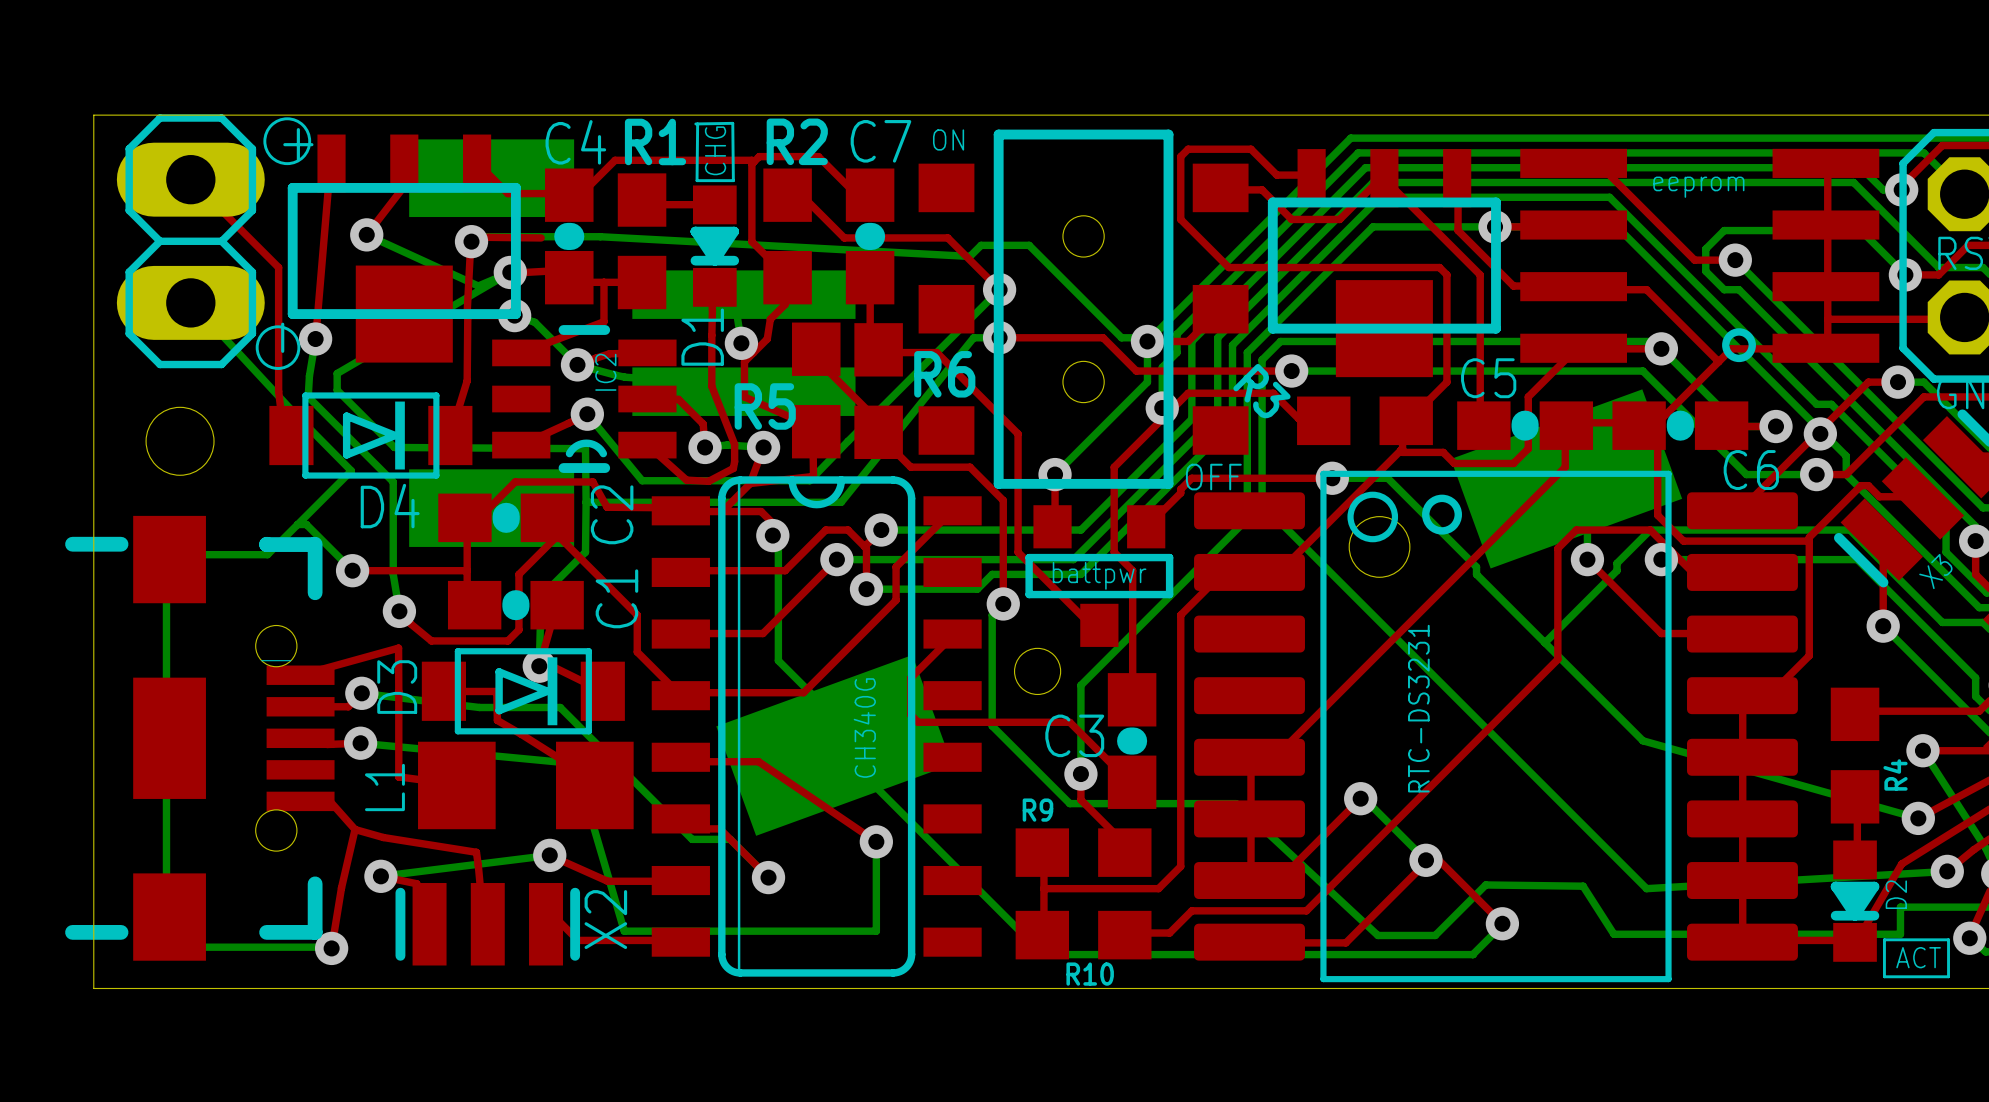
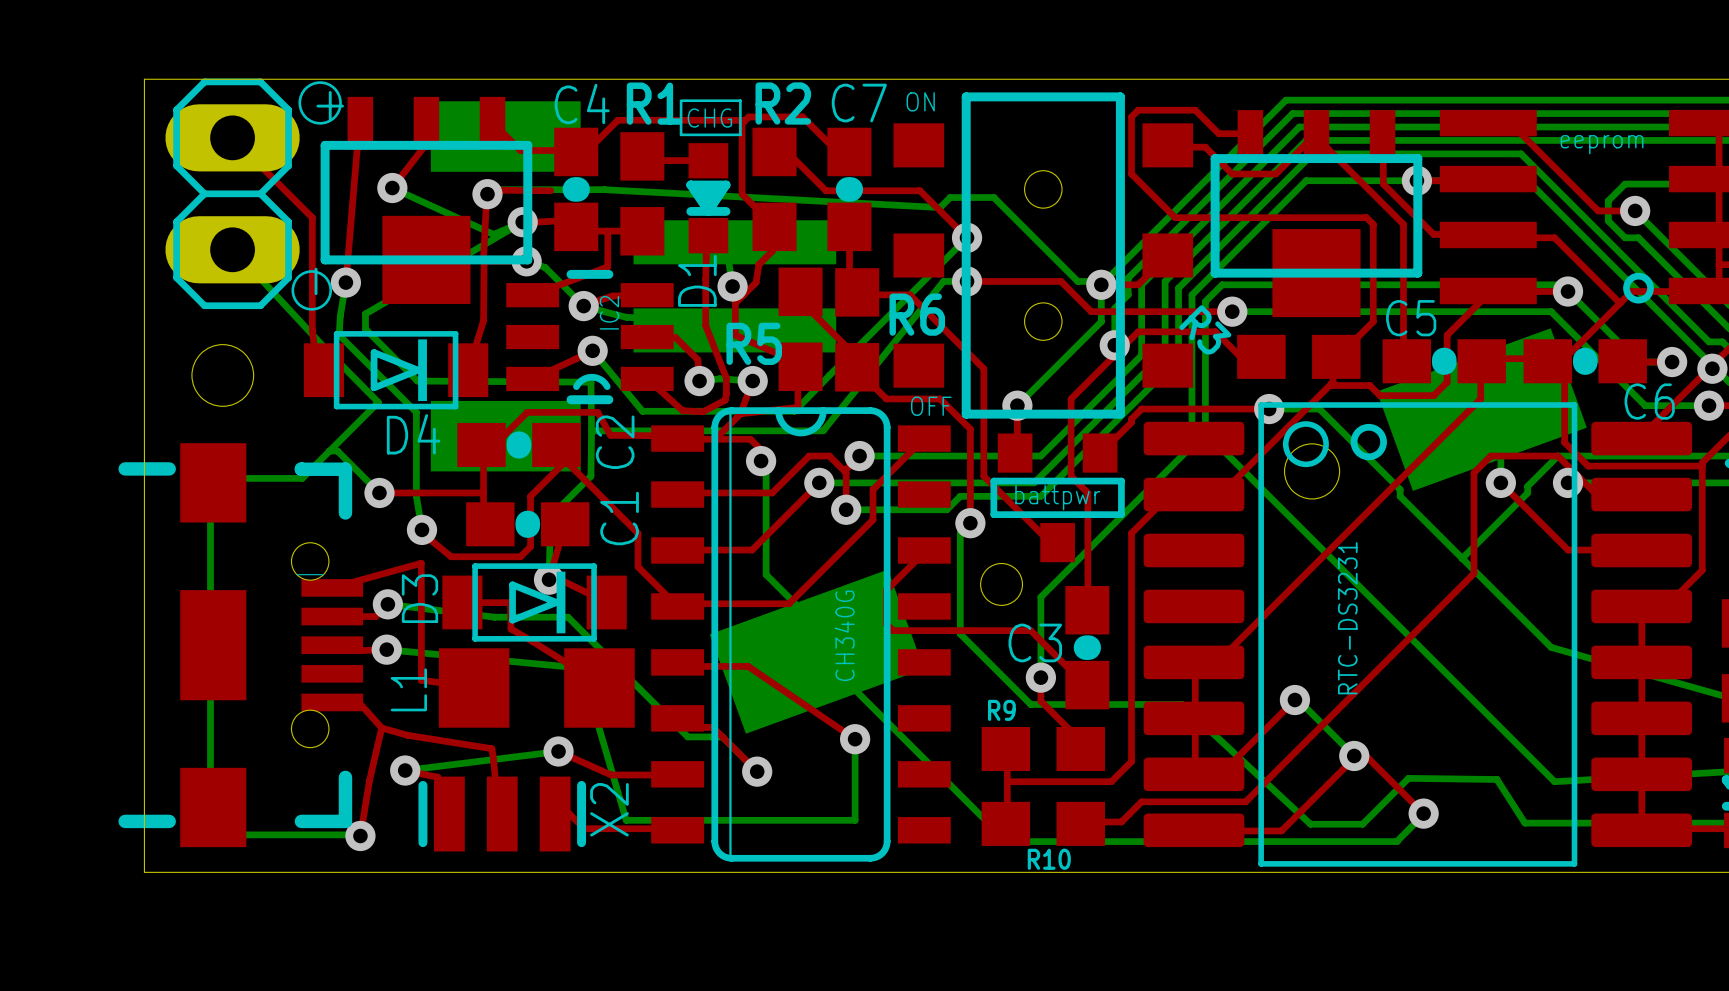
line: (695, 123) (732, 123) (733, 180) (697, 180) (697, 123) -> none
line: none -> (681, 100) (740, 100) (740, 134) (681, 134) (681, 101)
text rotation: 0° (715, 150) -> 90° clockwise (709, 118)
text position: OFF (1213, 477) -> OFF (931, 406)

